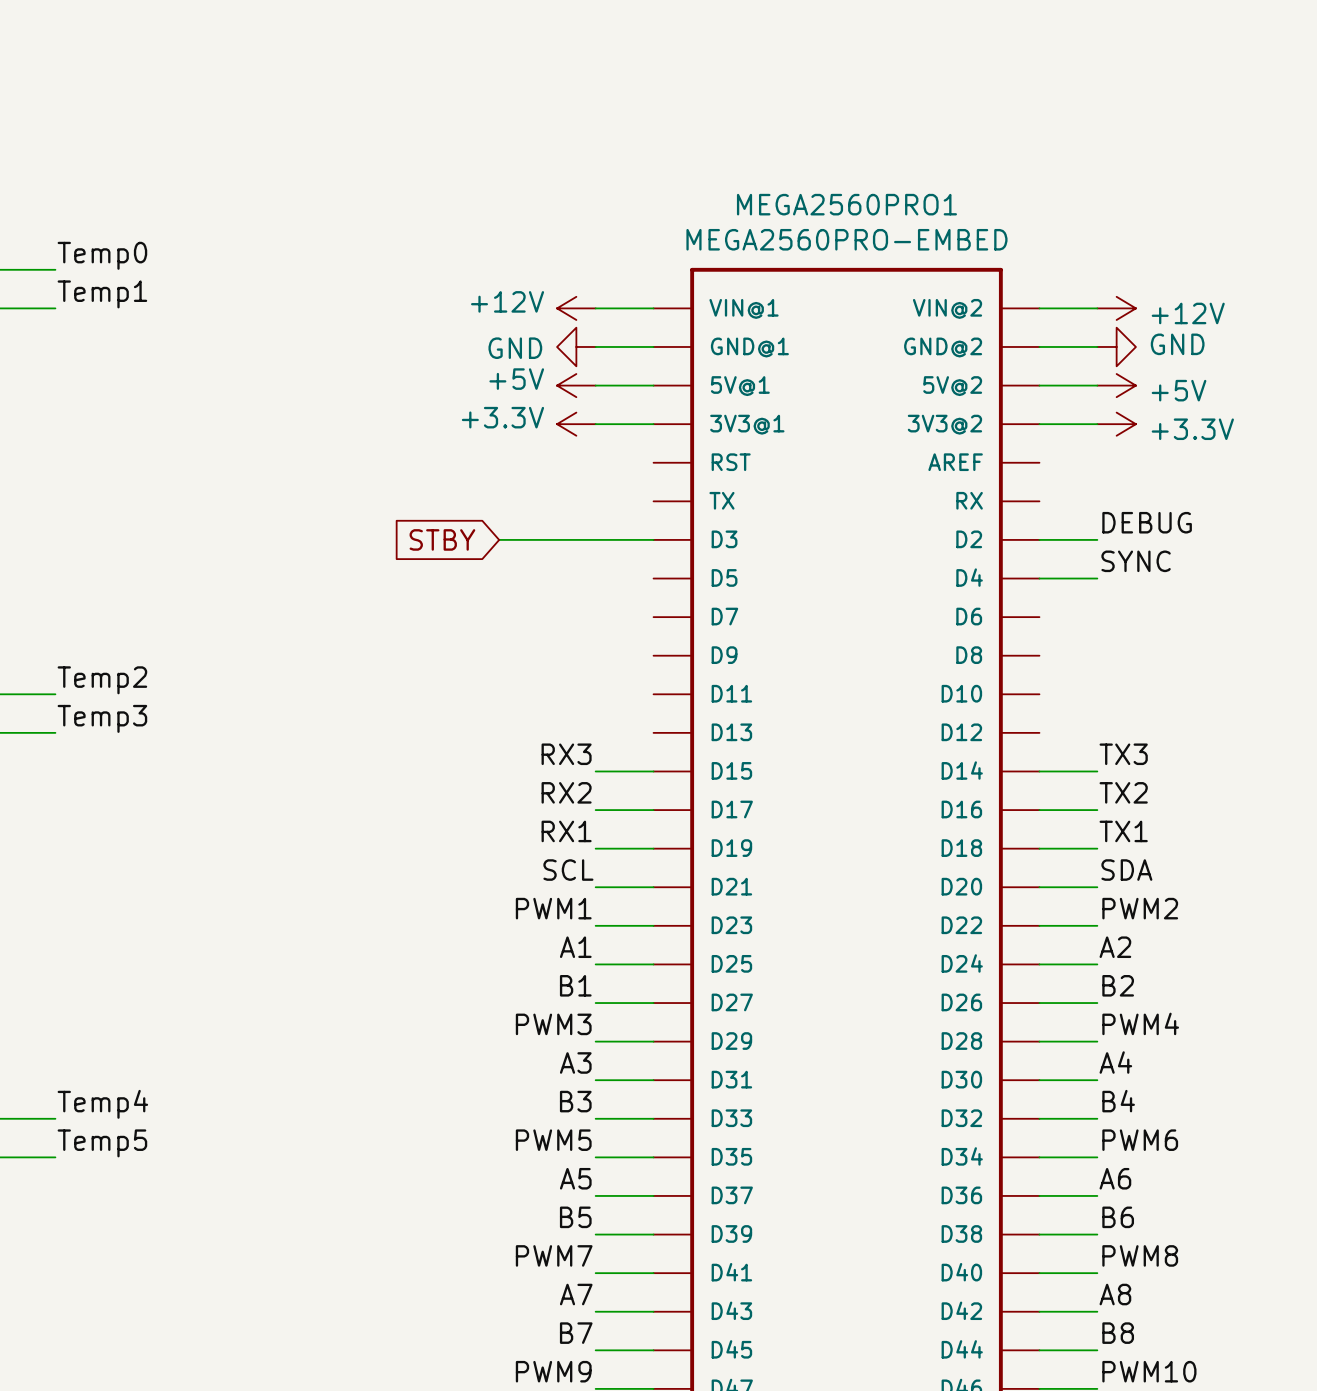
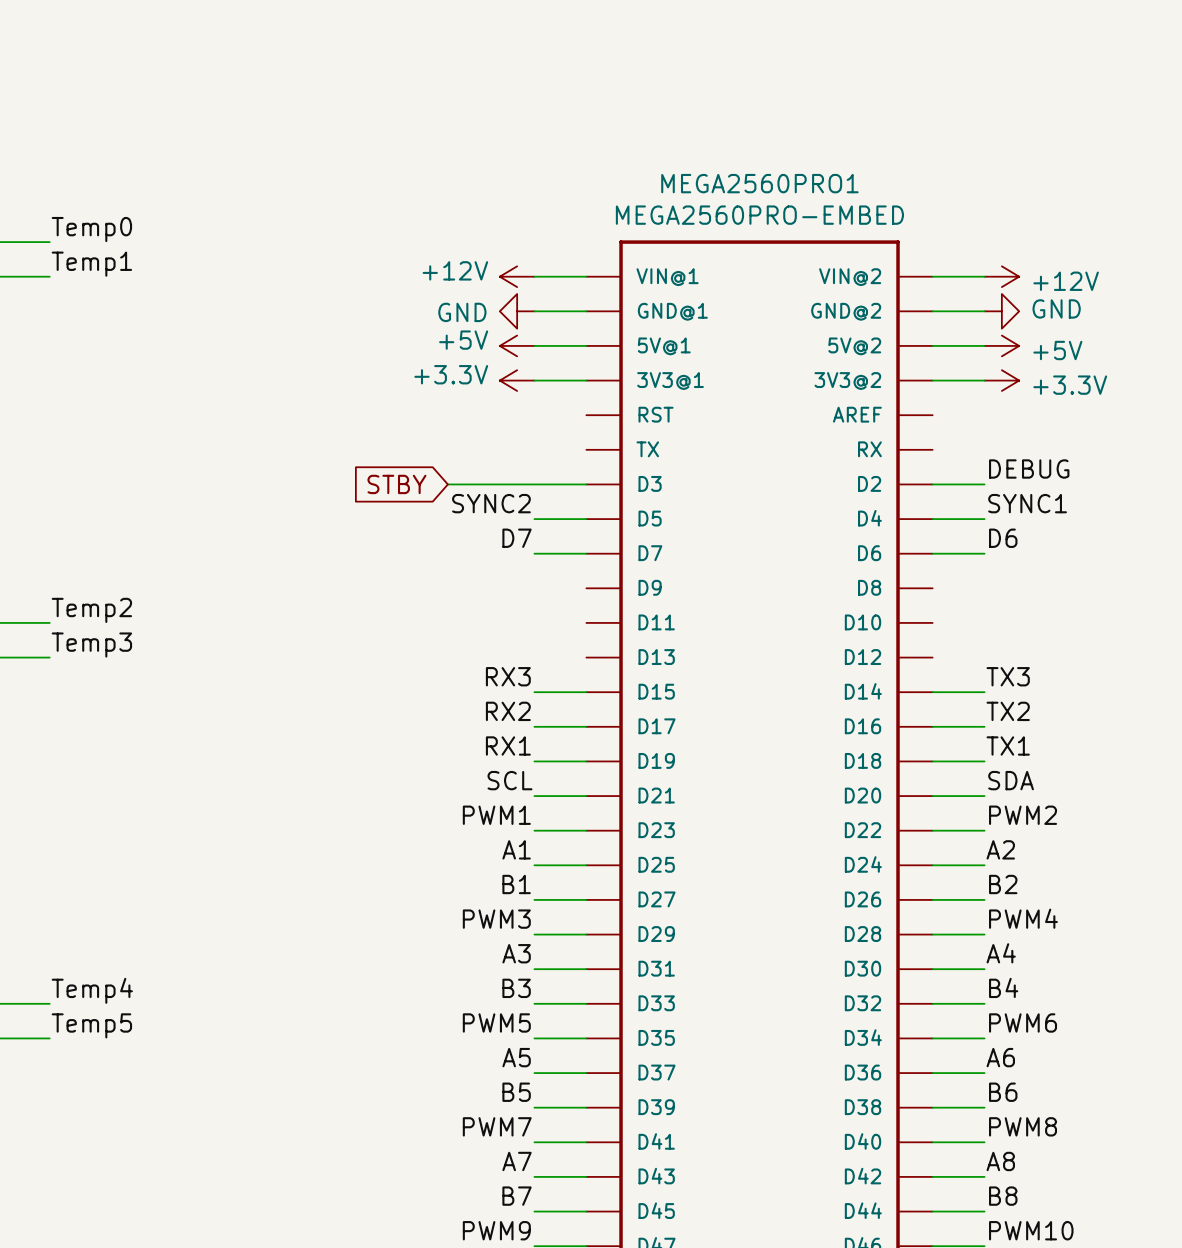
label: none -> SYNC2 (491, 503)
label: SYNC (1136, 561) -> SYNC1 (1027, 503)
wire: none -> (534, 519) (586, 519)
label: none -> D7 (517, 538)
label: none -> D6 (1003, 538)
wire: none -> (534, 553) (586, 553)
wire: none -> (932, 553) (984, 553)

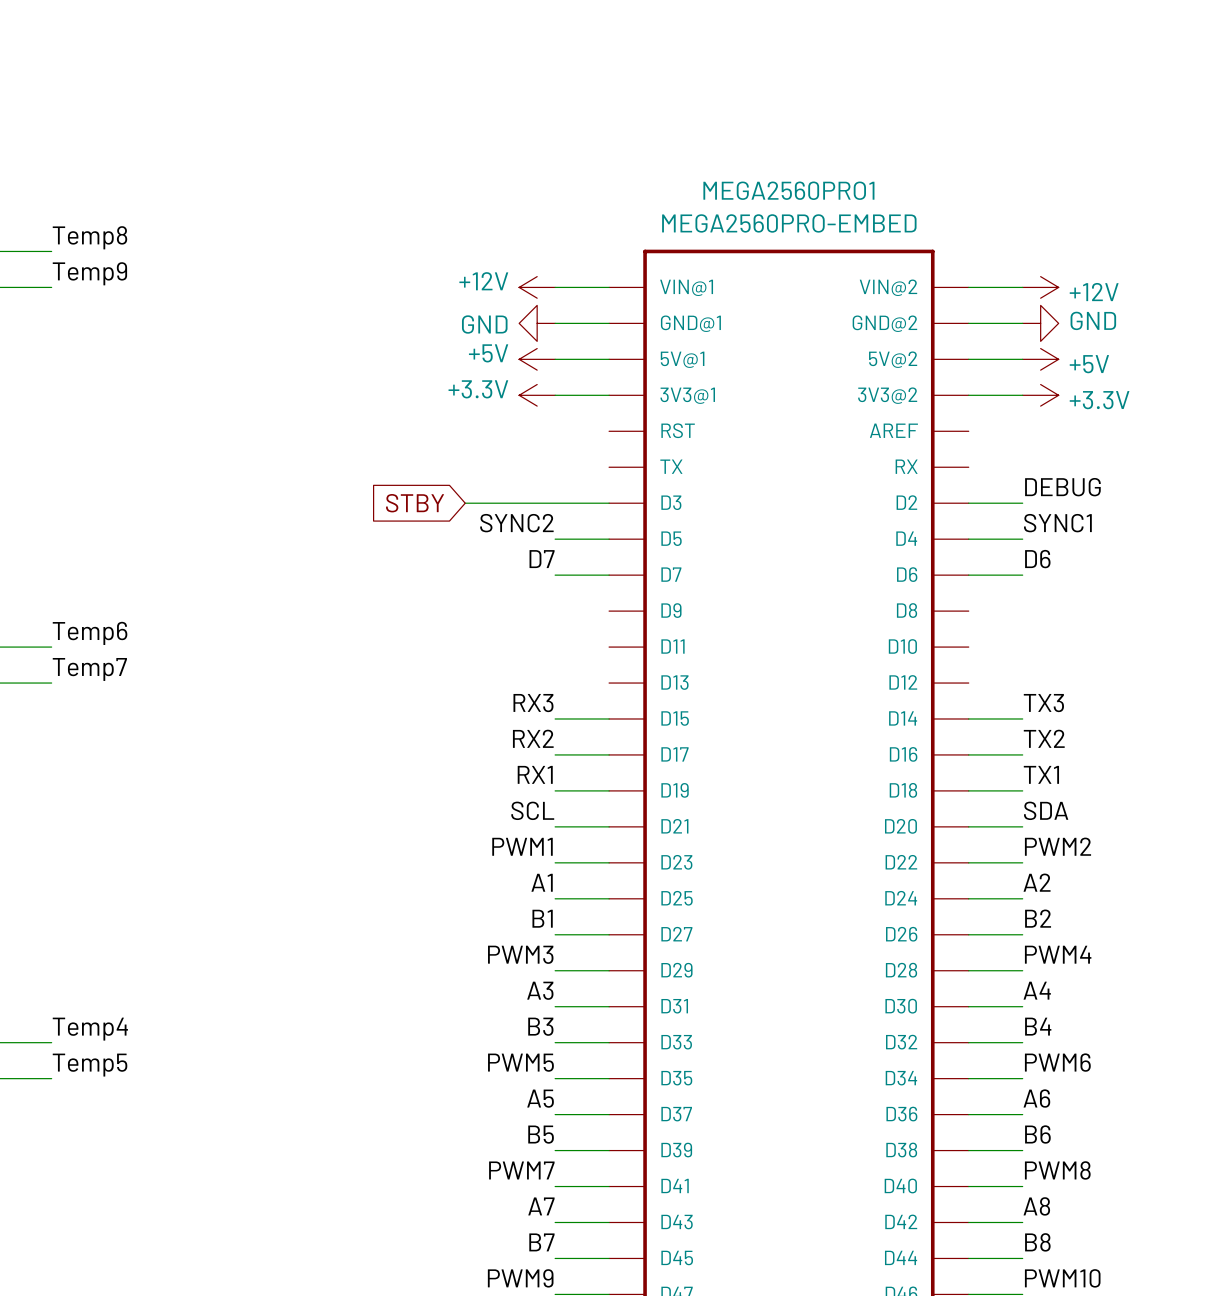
label: Temp0 (91, 229) -> Temp8 (89, 237)
label: Temp1 (91, 264) -> Temp9 (89, 273)
label: Temp2 (91, 610) -> Temp6 (90, 633)
label: Temp3 (91, 645) -> Temp7 (89, 669)

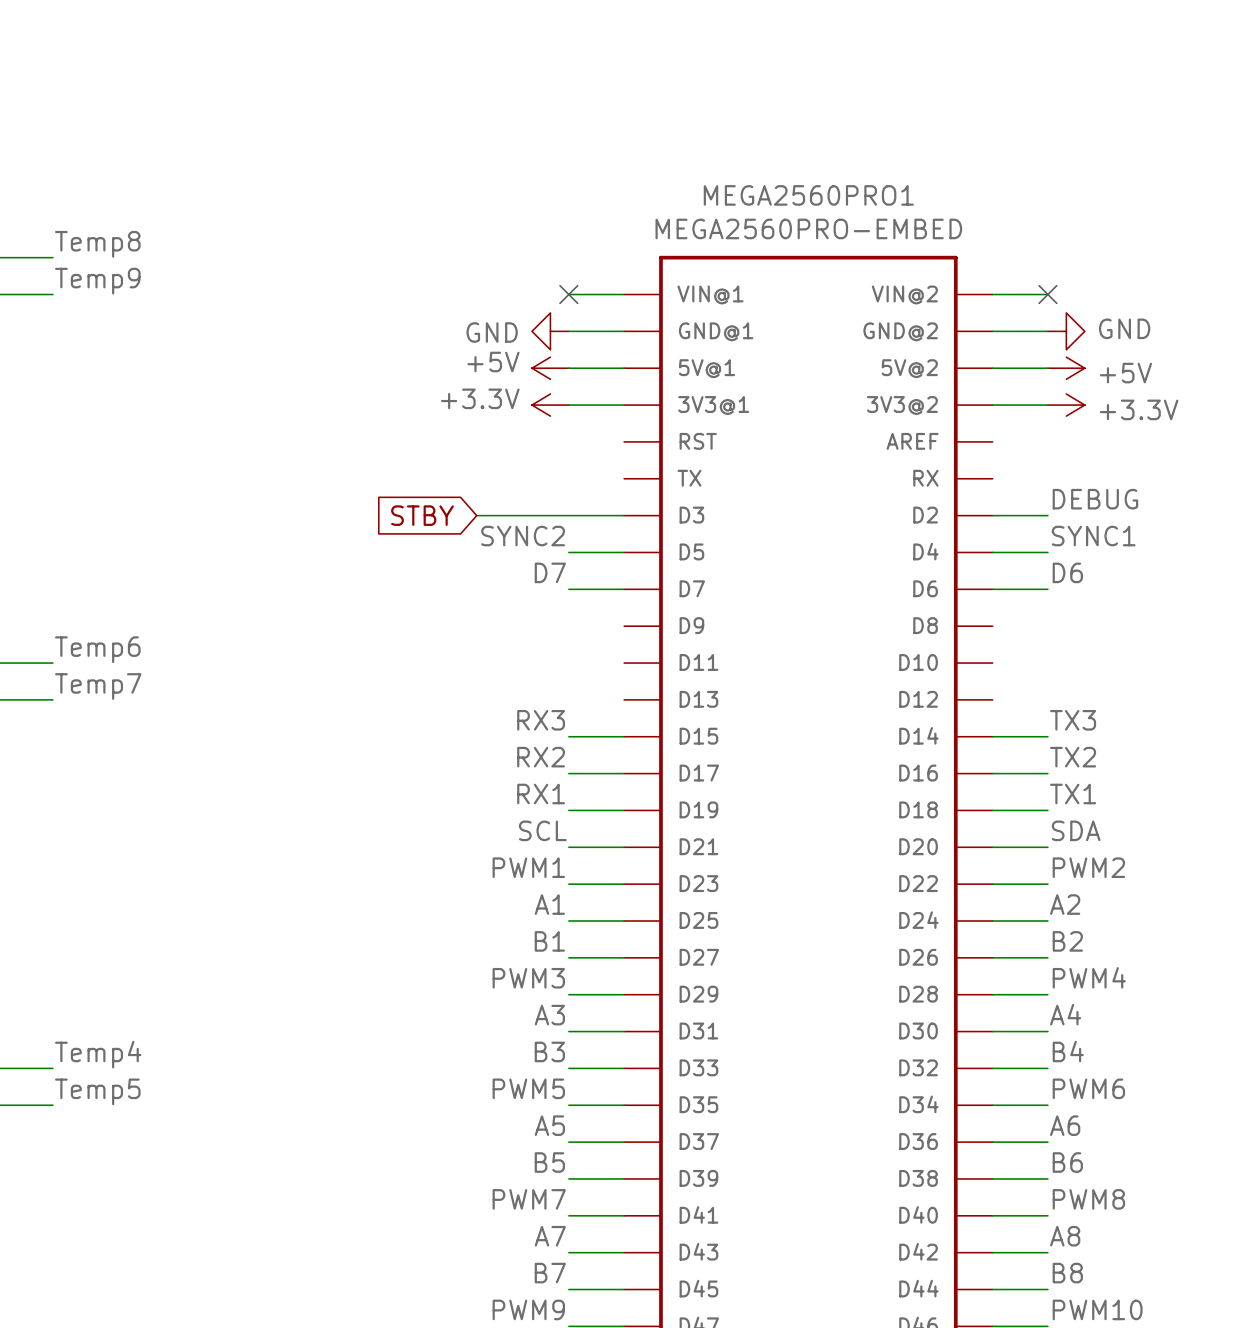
power symbol: +12V (537, 287) -> none
no-connect mark: none -> (568, 294)
no-connect mark: none -> (1047, 294)
power symbol: +12V (1040, 287) -> none

